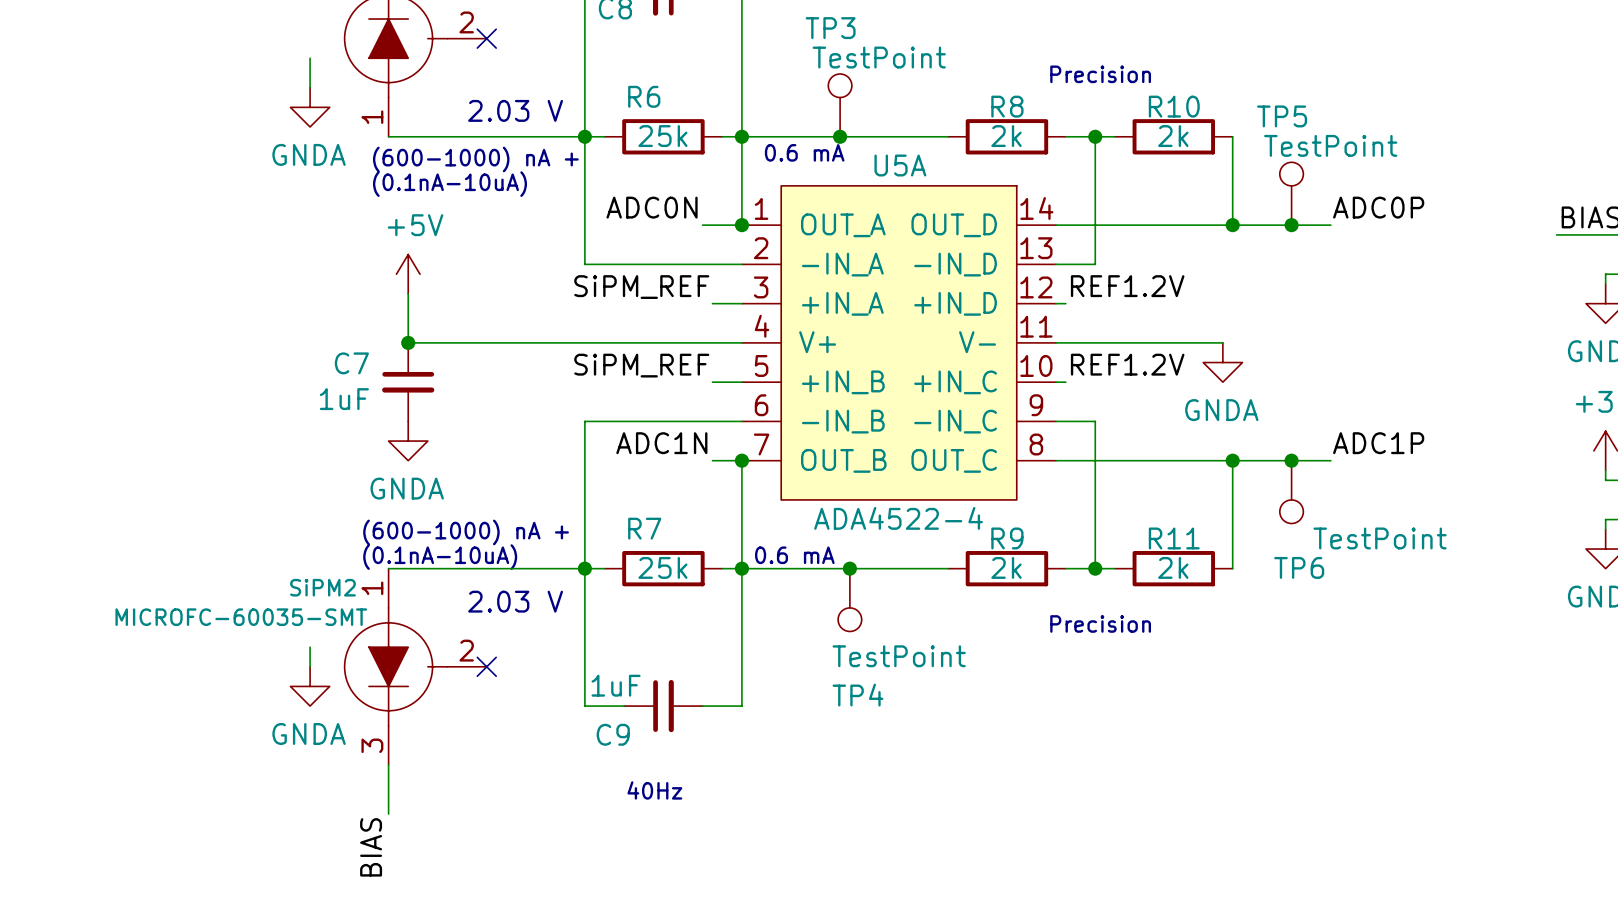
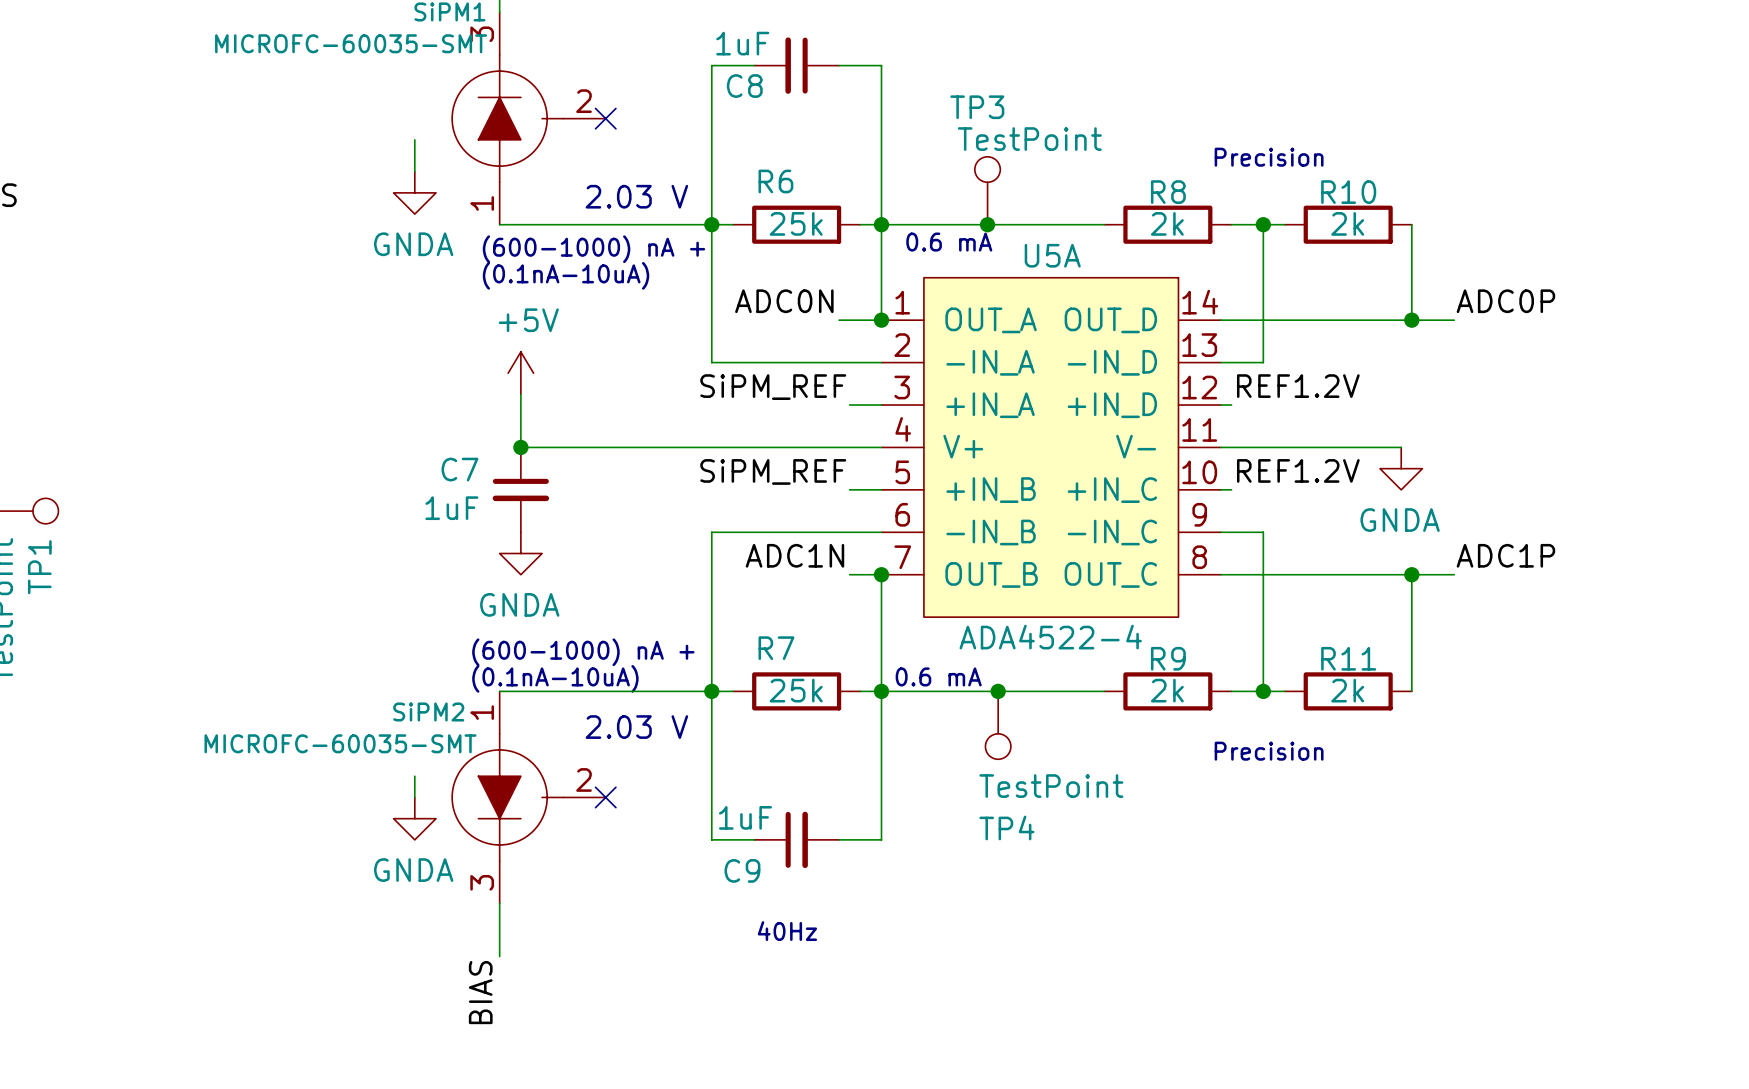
TP5: TestPoint (1291, 193) -> none
label position: ADC0P (1378, 207) -> ADC0P (1505, 301)
wire: (1271, 225) (1330, 225) -> none
junction: (1291, 225) -> none
label position: ADC1P (1378, 443) -> ADC1P (1505, 555)
wire: (1271, 460) (1330, 460) -> none
junction: (1291, 460) -> none
TP6: TestPoint (1291, 492) -> none

